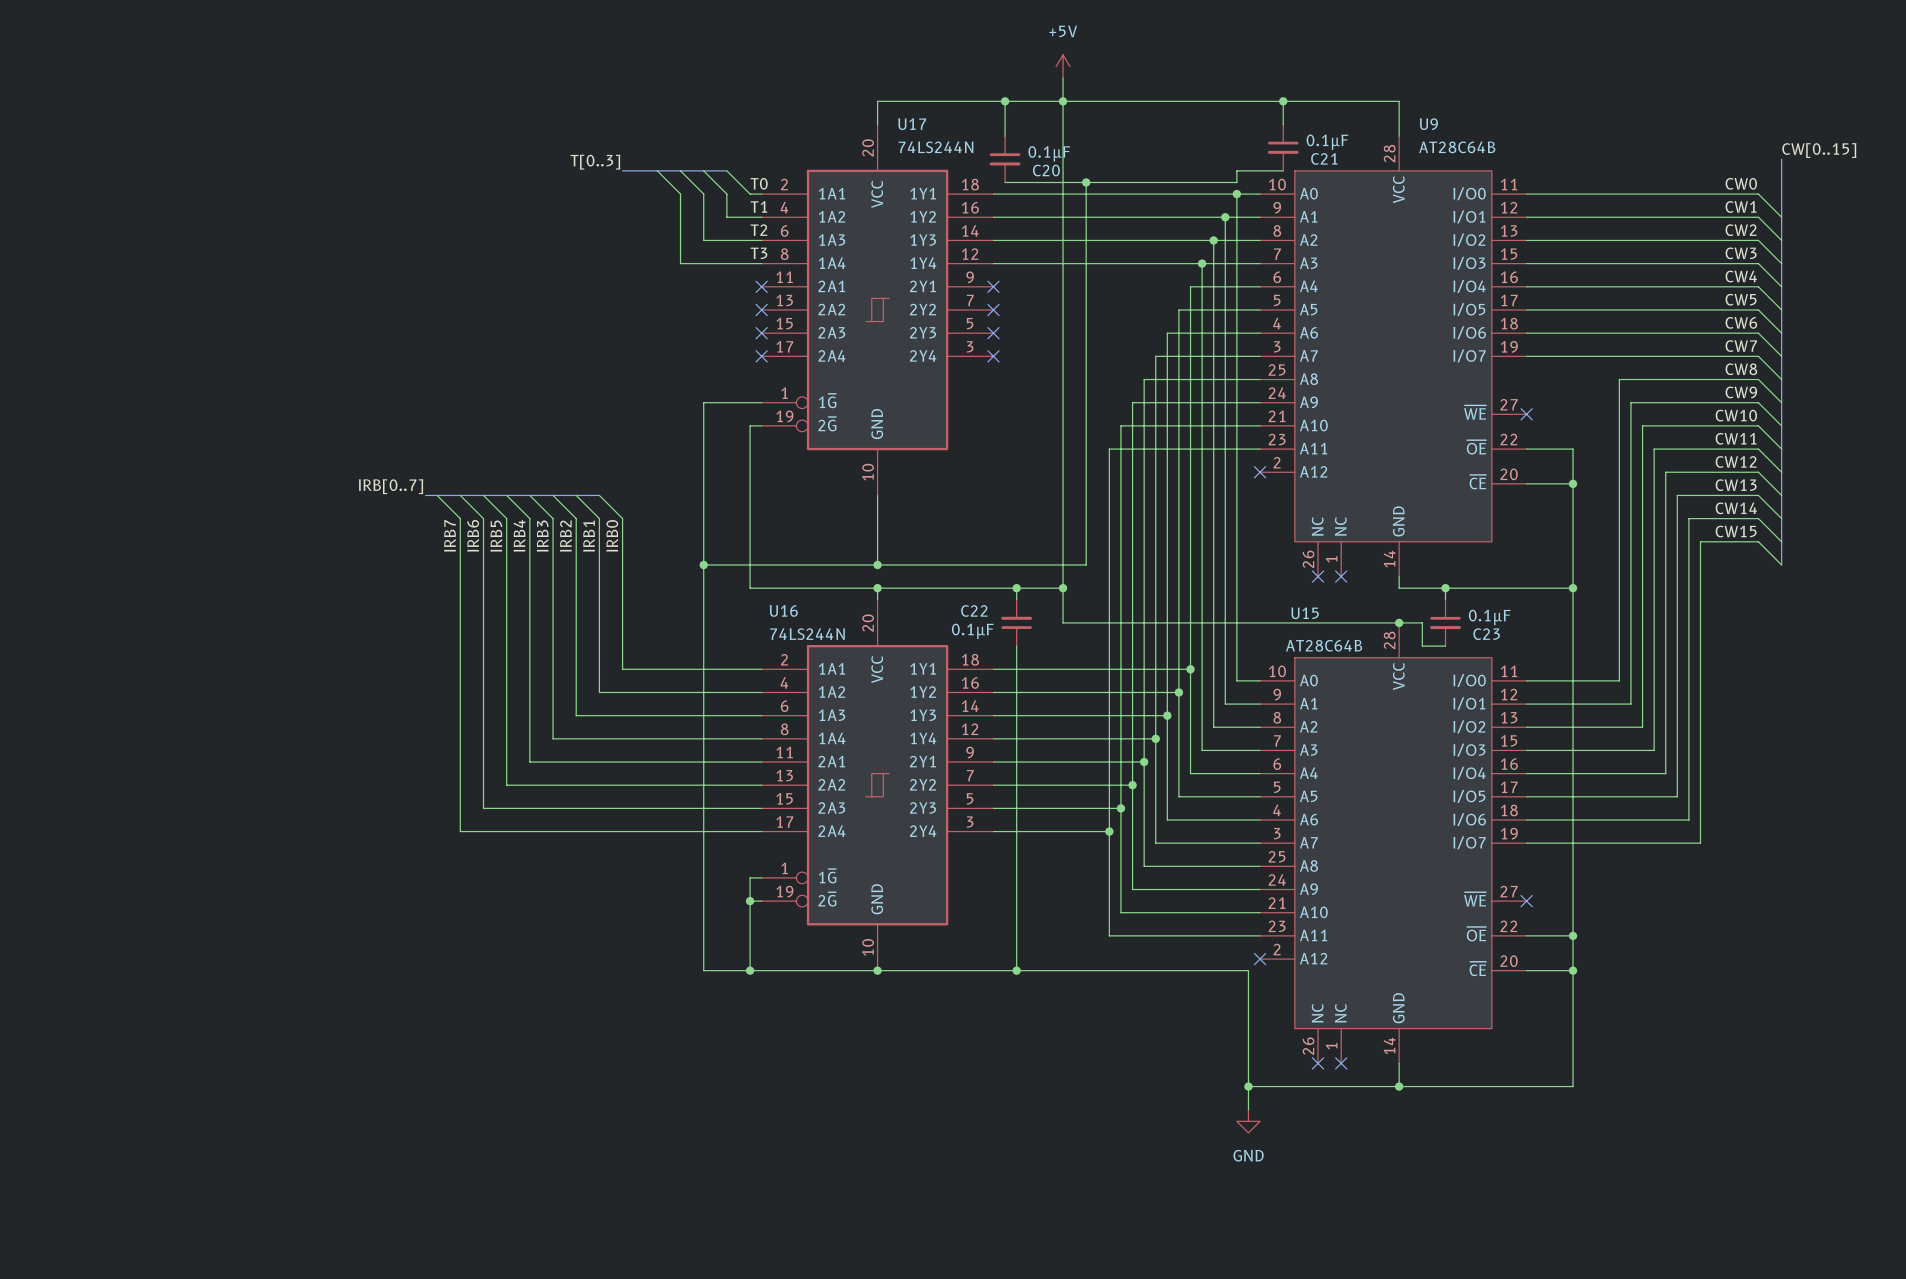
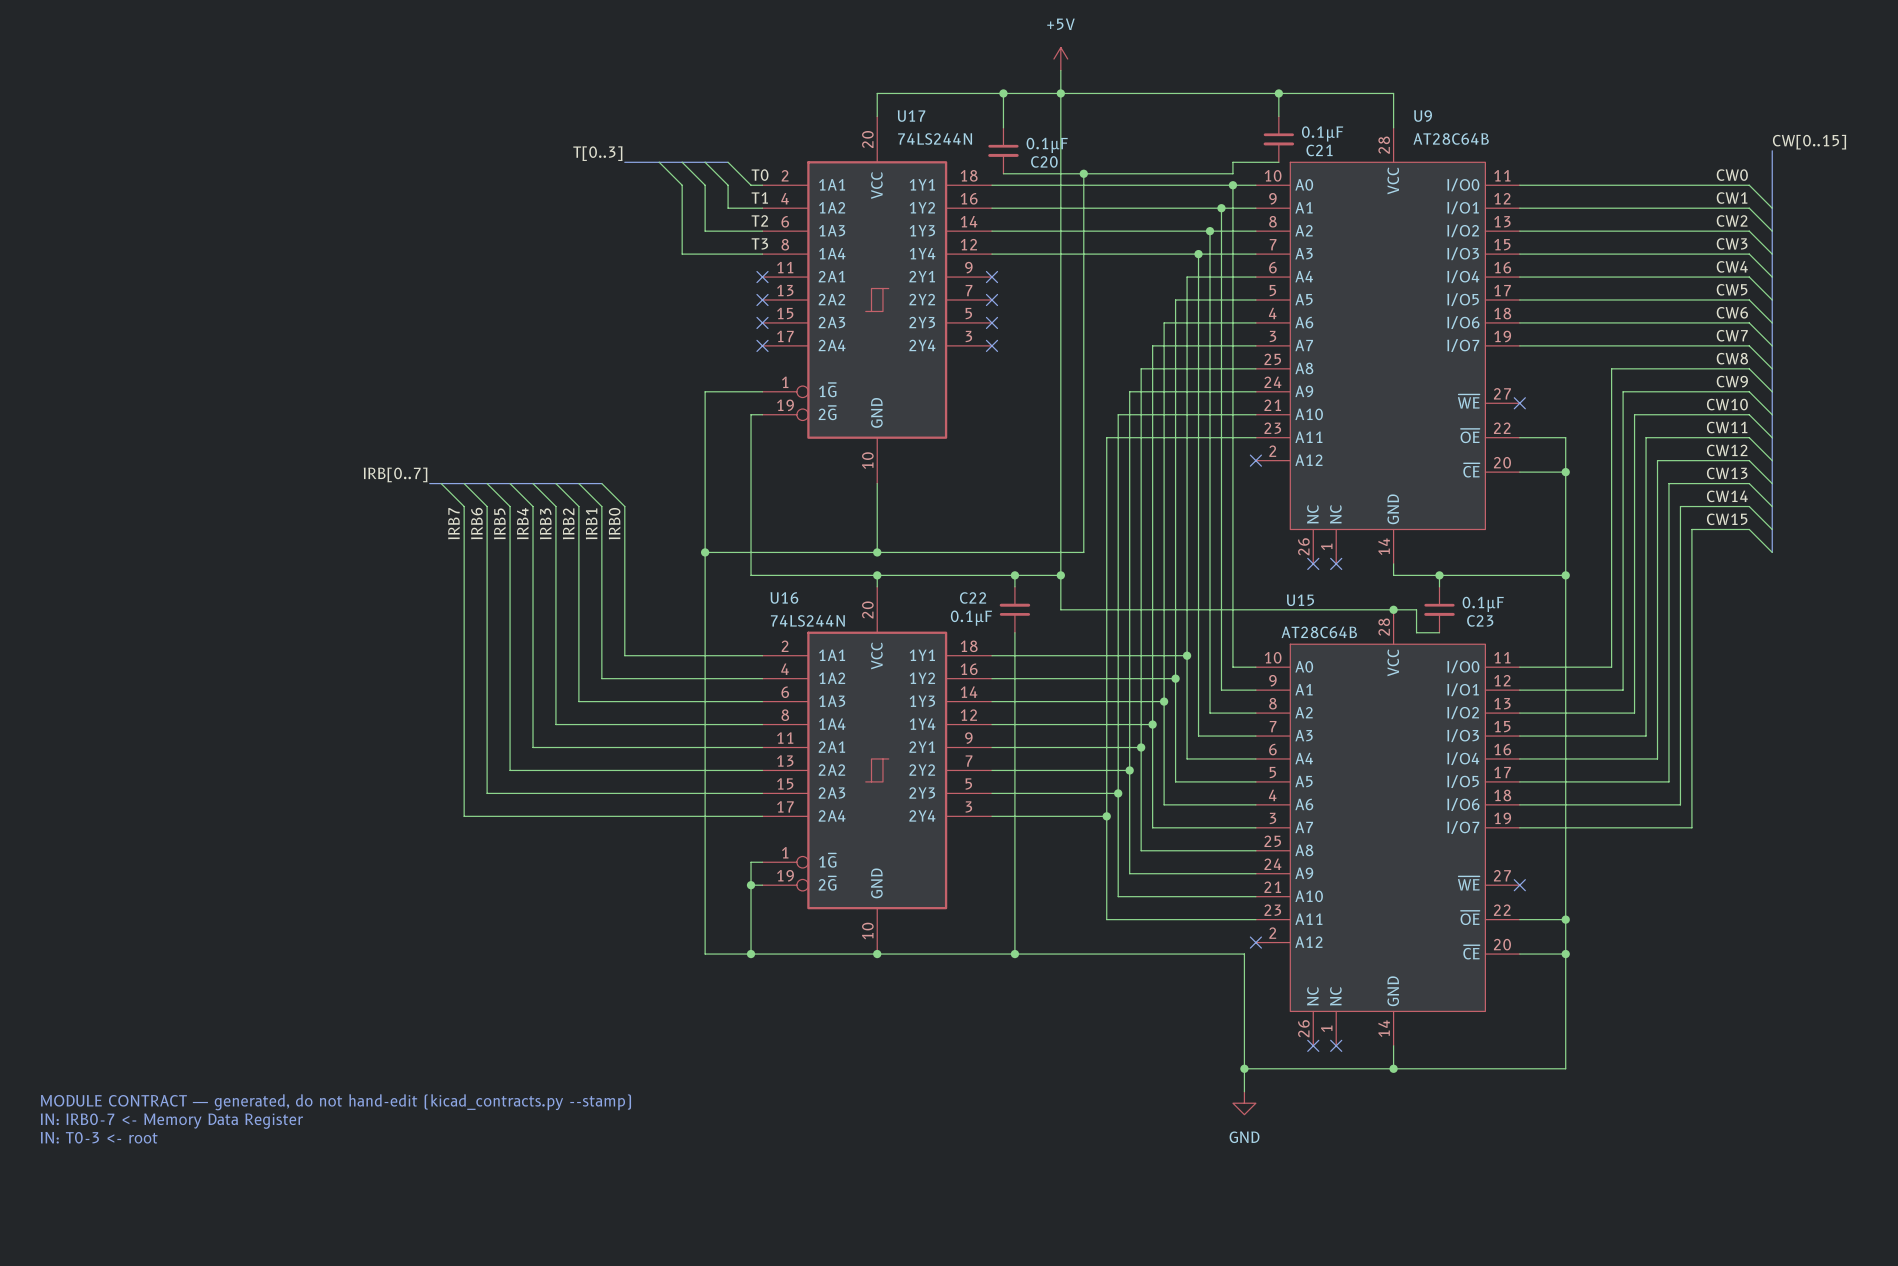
text: none -> MODULE CONTRACT — generated, do not hand-edit (kicad_contracts.py --stamp) (335, 1102)
text: none -> IN: IRB0-7 <- Memory Data Register (171, 1121)
text: none -> IN: T0-3 <- root (99, 1137)

